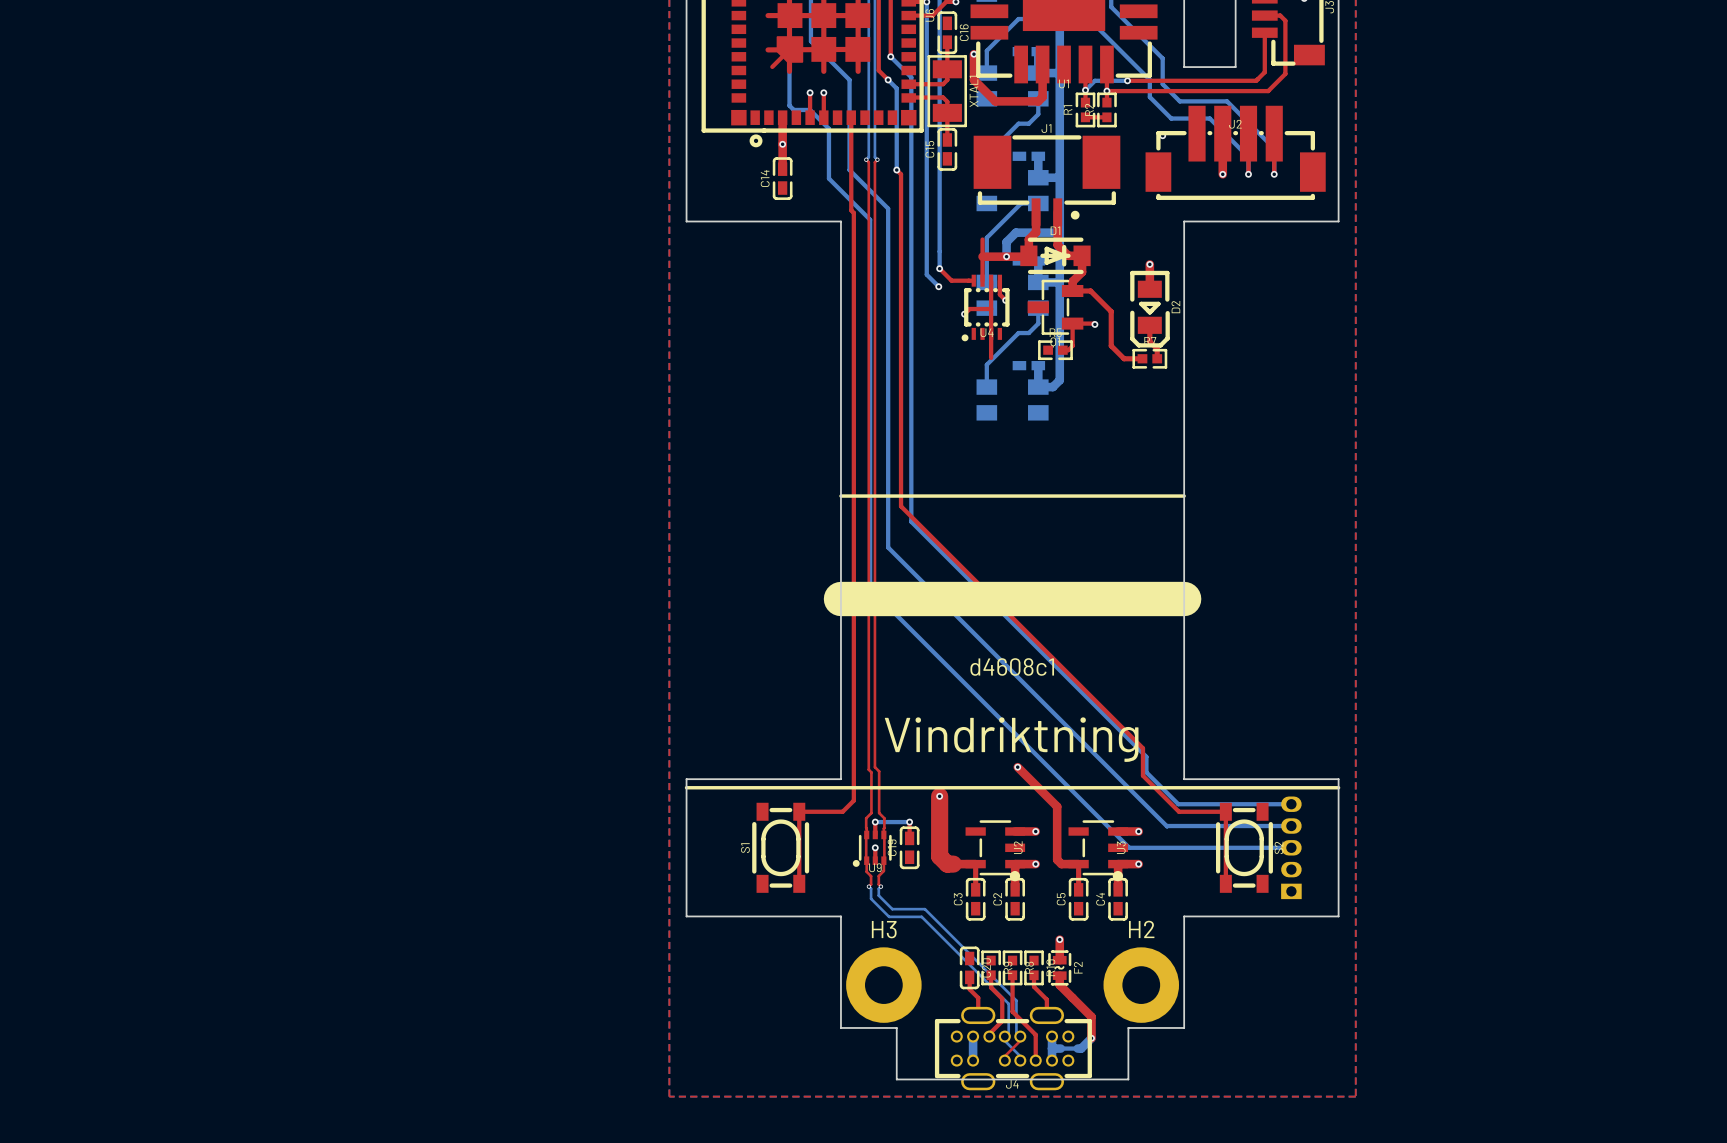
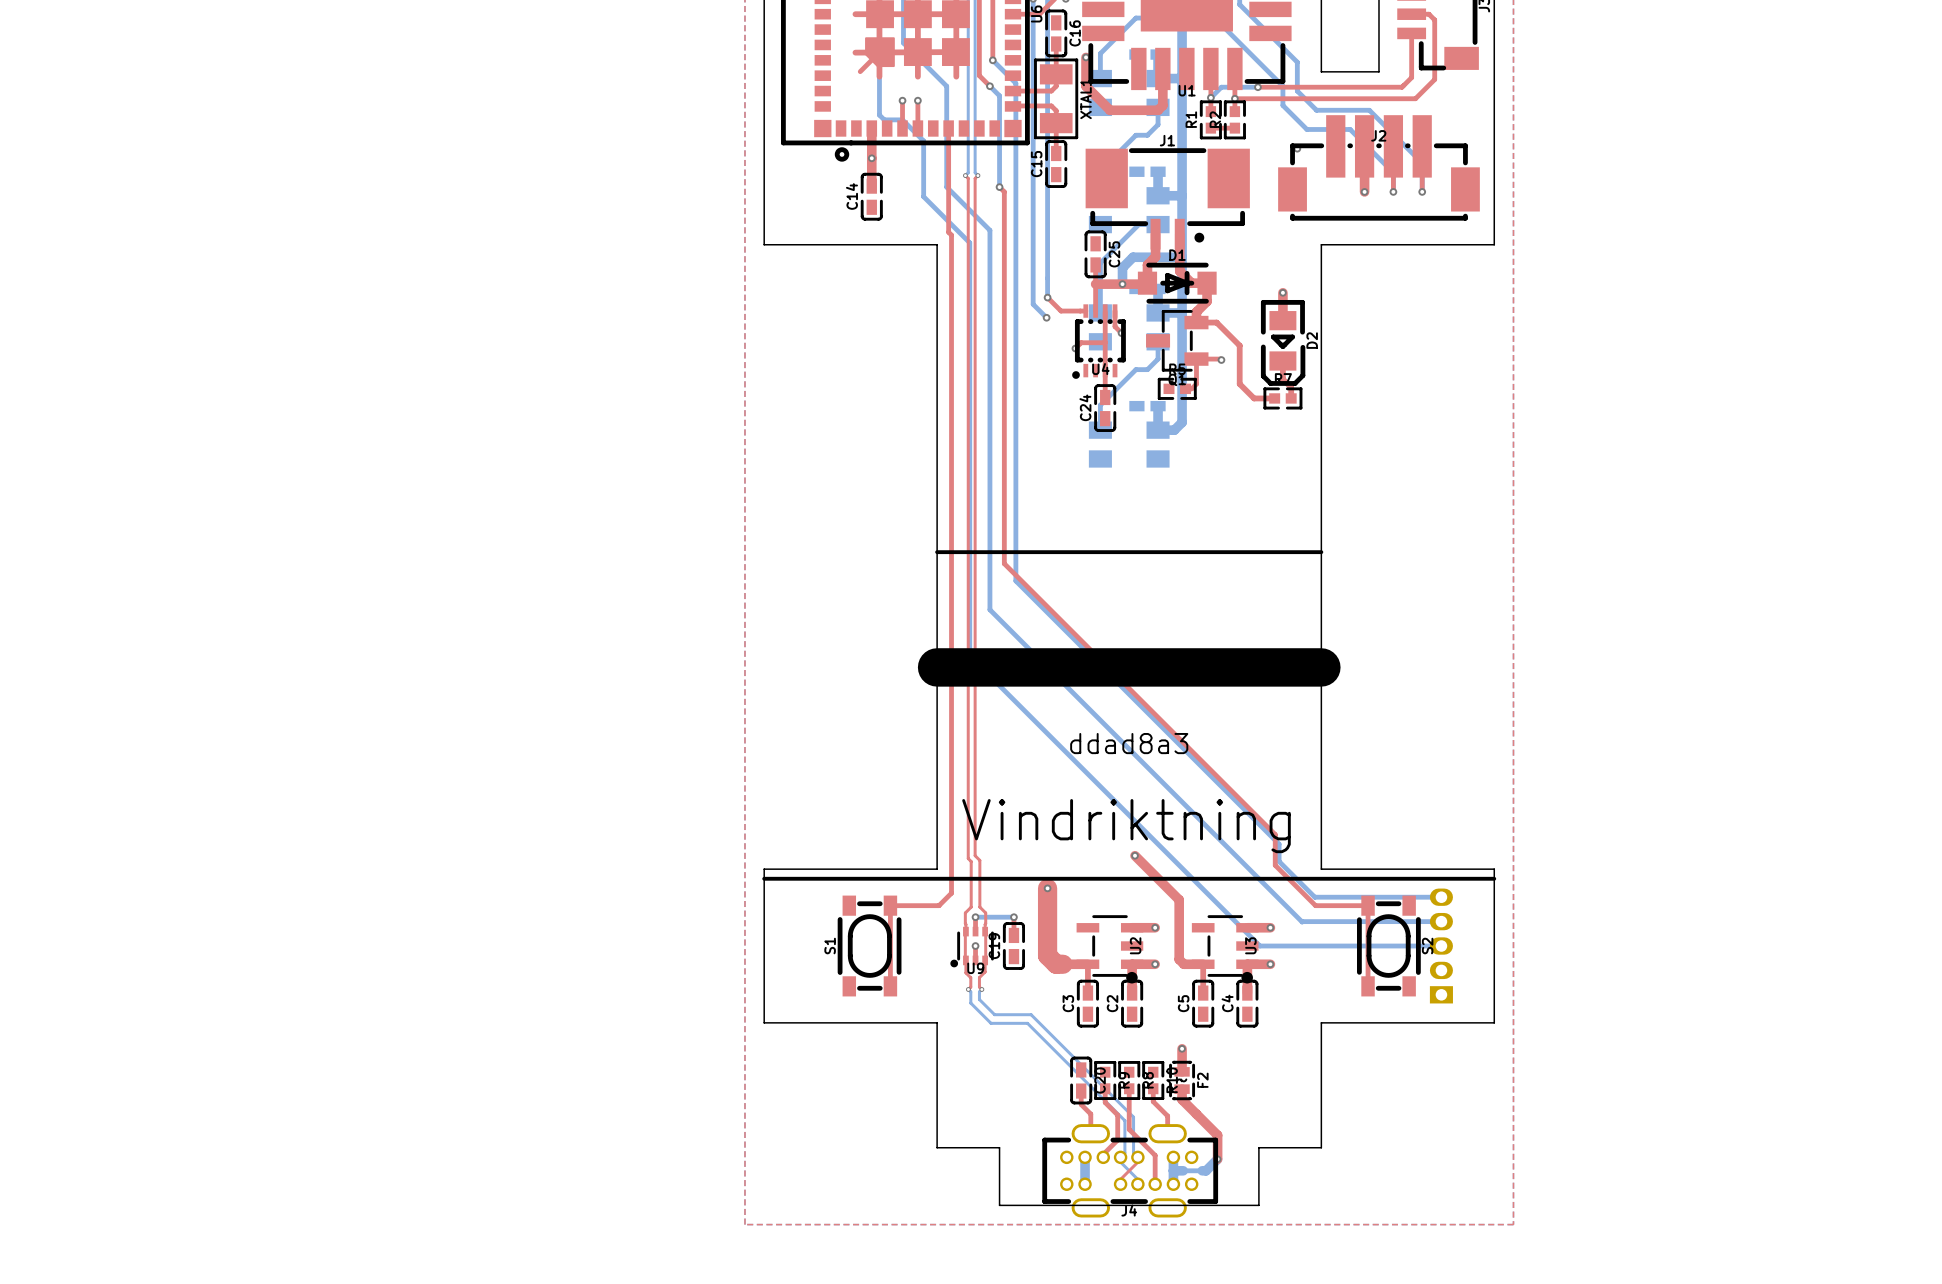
C25: none -> (1095, 254)
C24: none -> (1105, 408)
text: d4608c1 (1012, 667) -> ddad8a3 (1129, 743)
H3: (883, 985) -> none
H2: (1141, 985) -> none

